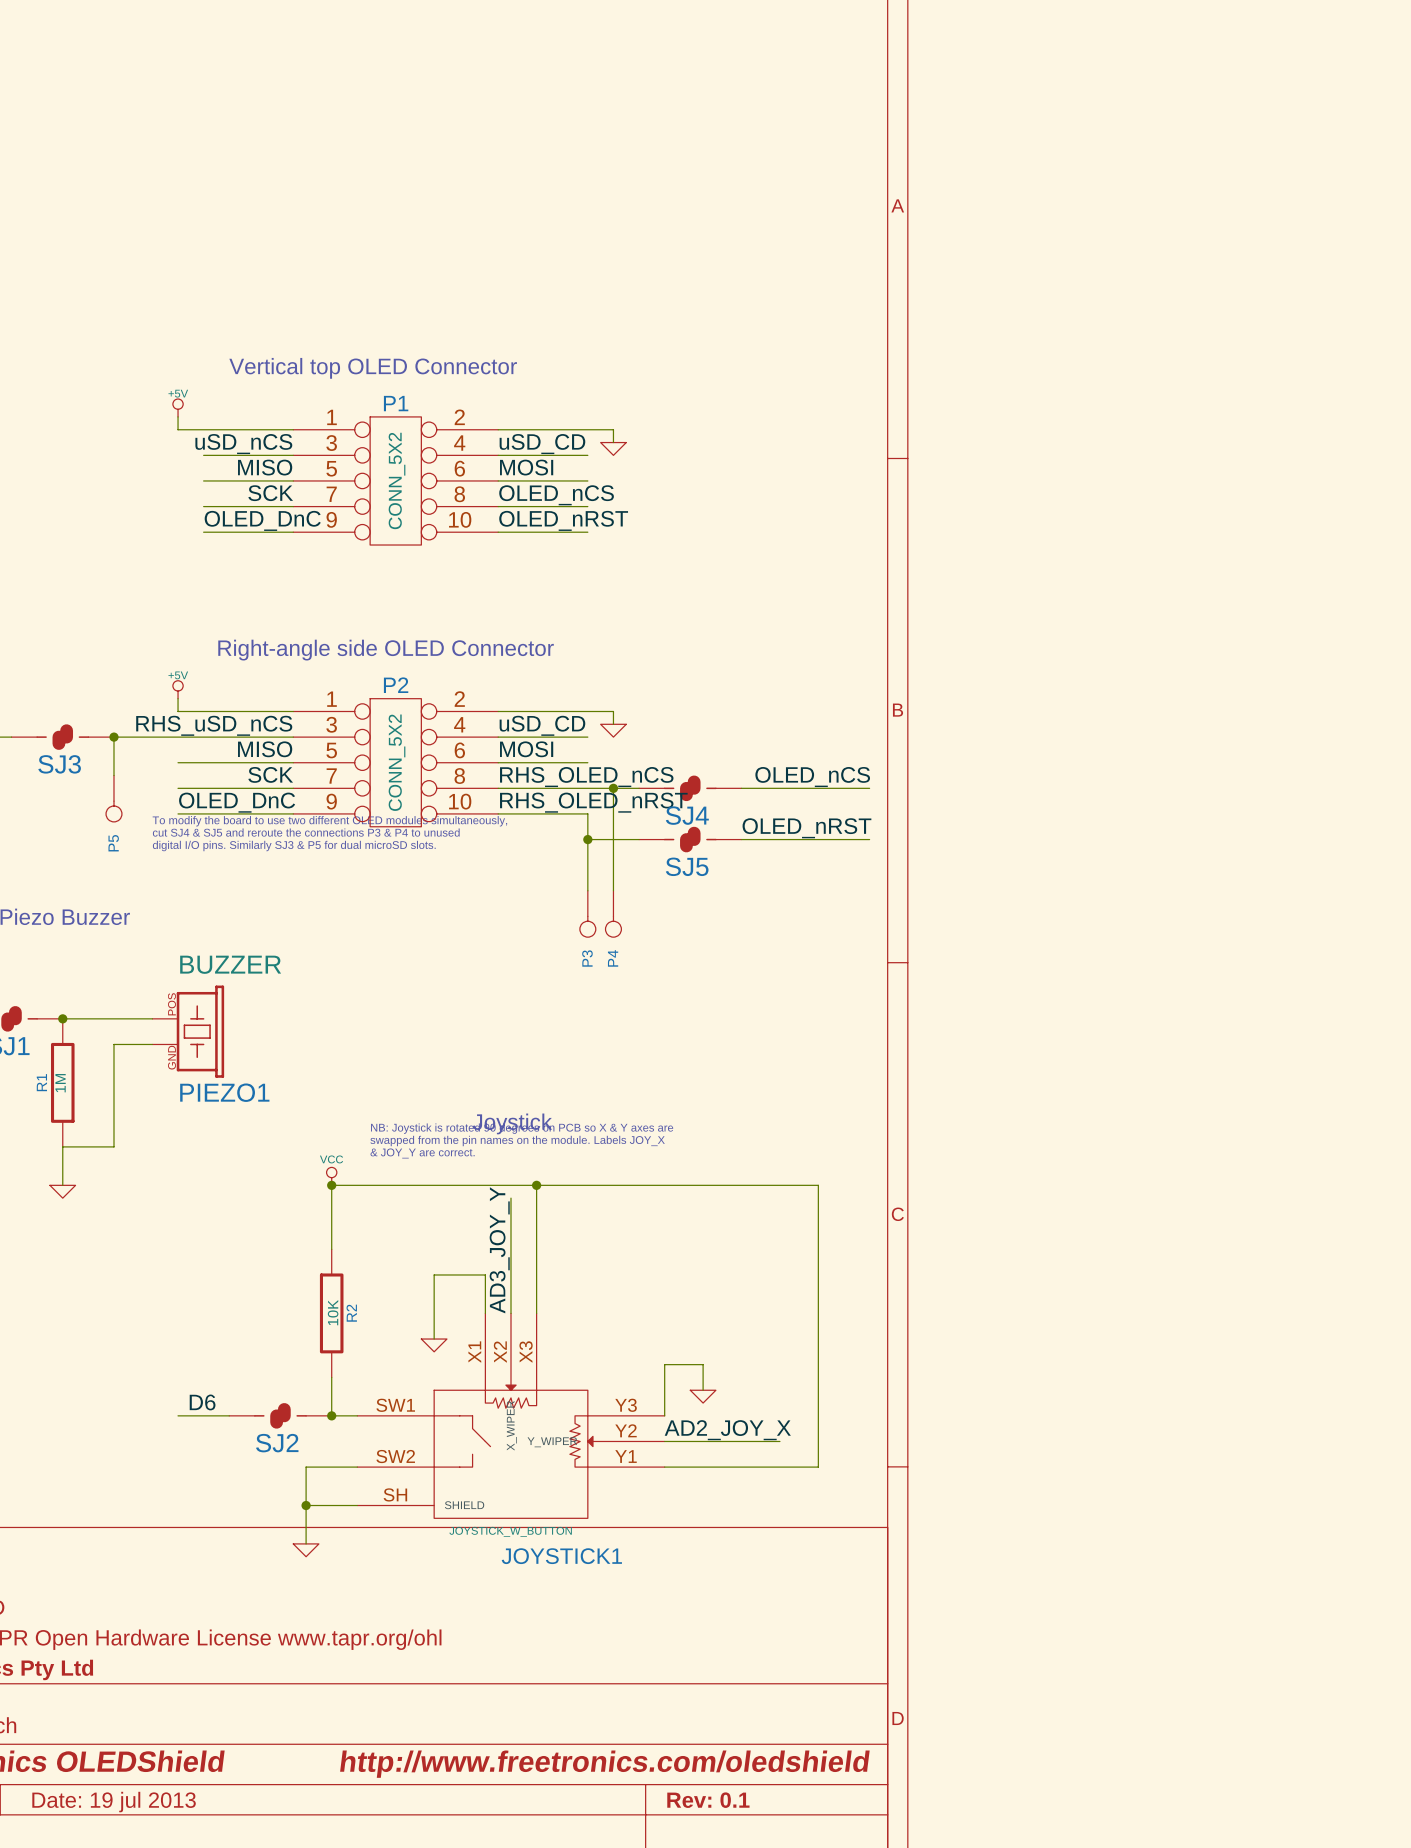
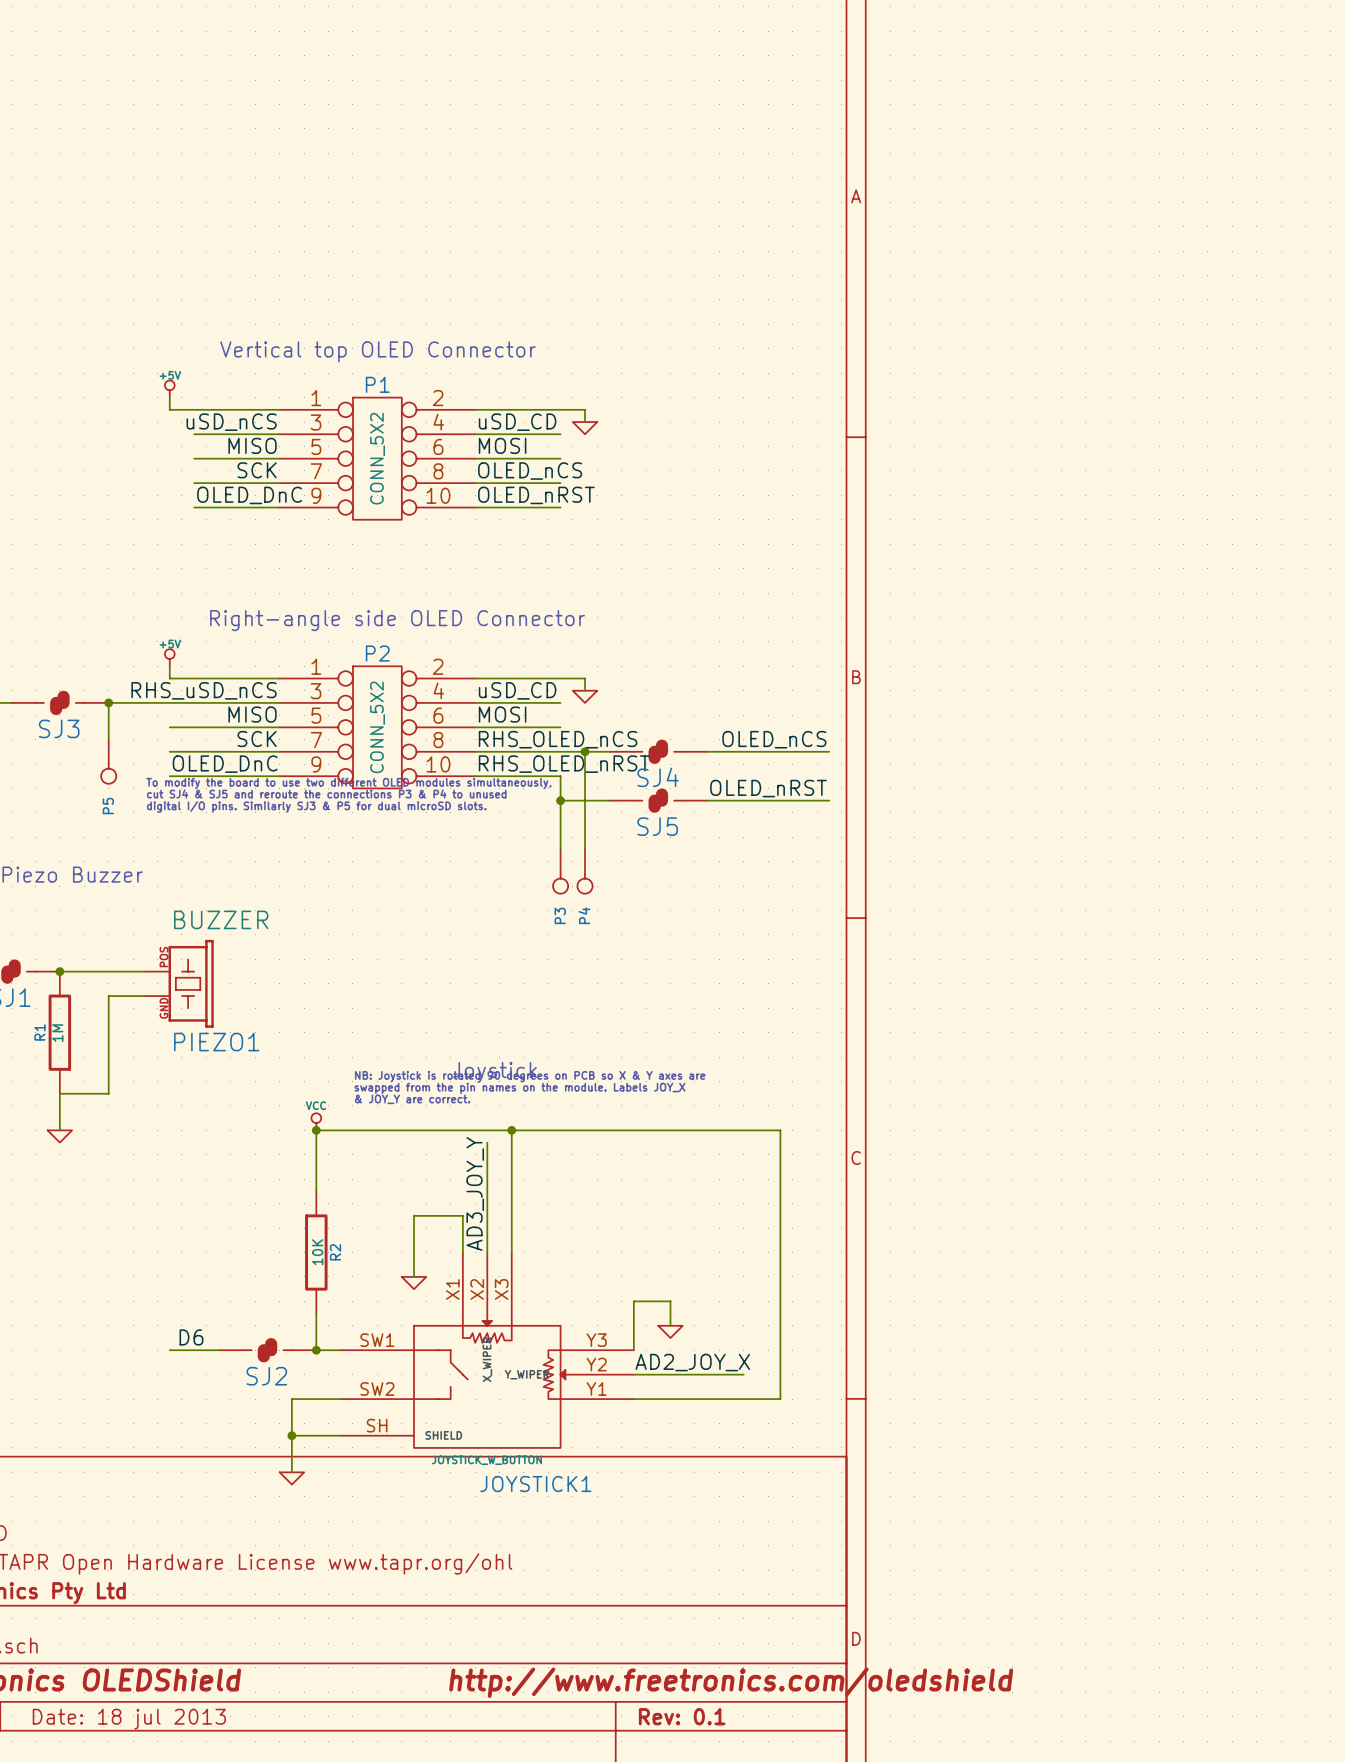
title block: Date: 19 jul 2013 (114, 1802) -> Date: 18 jul 2013 (129, 1719)

